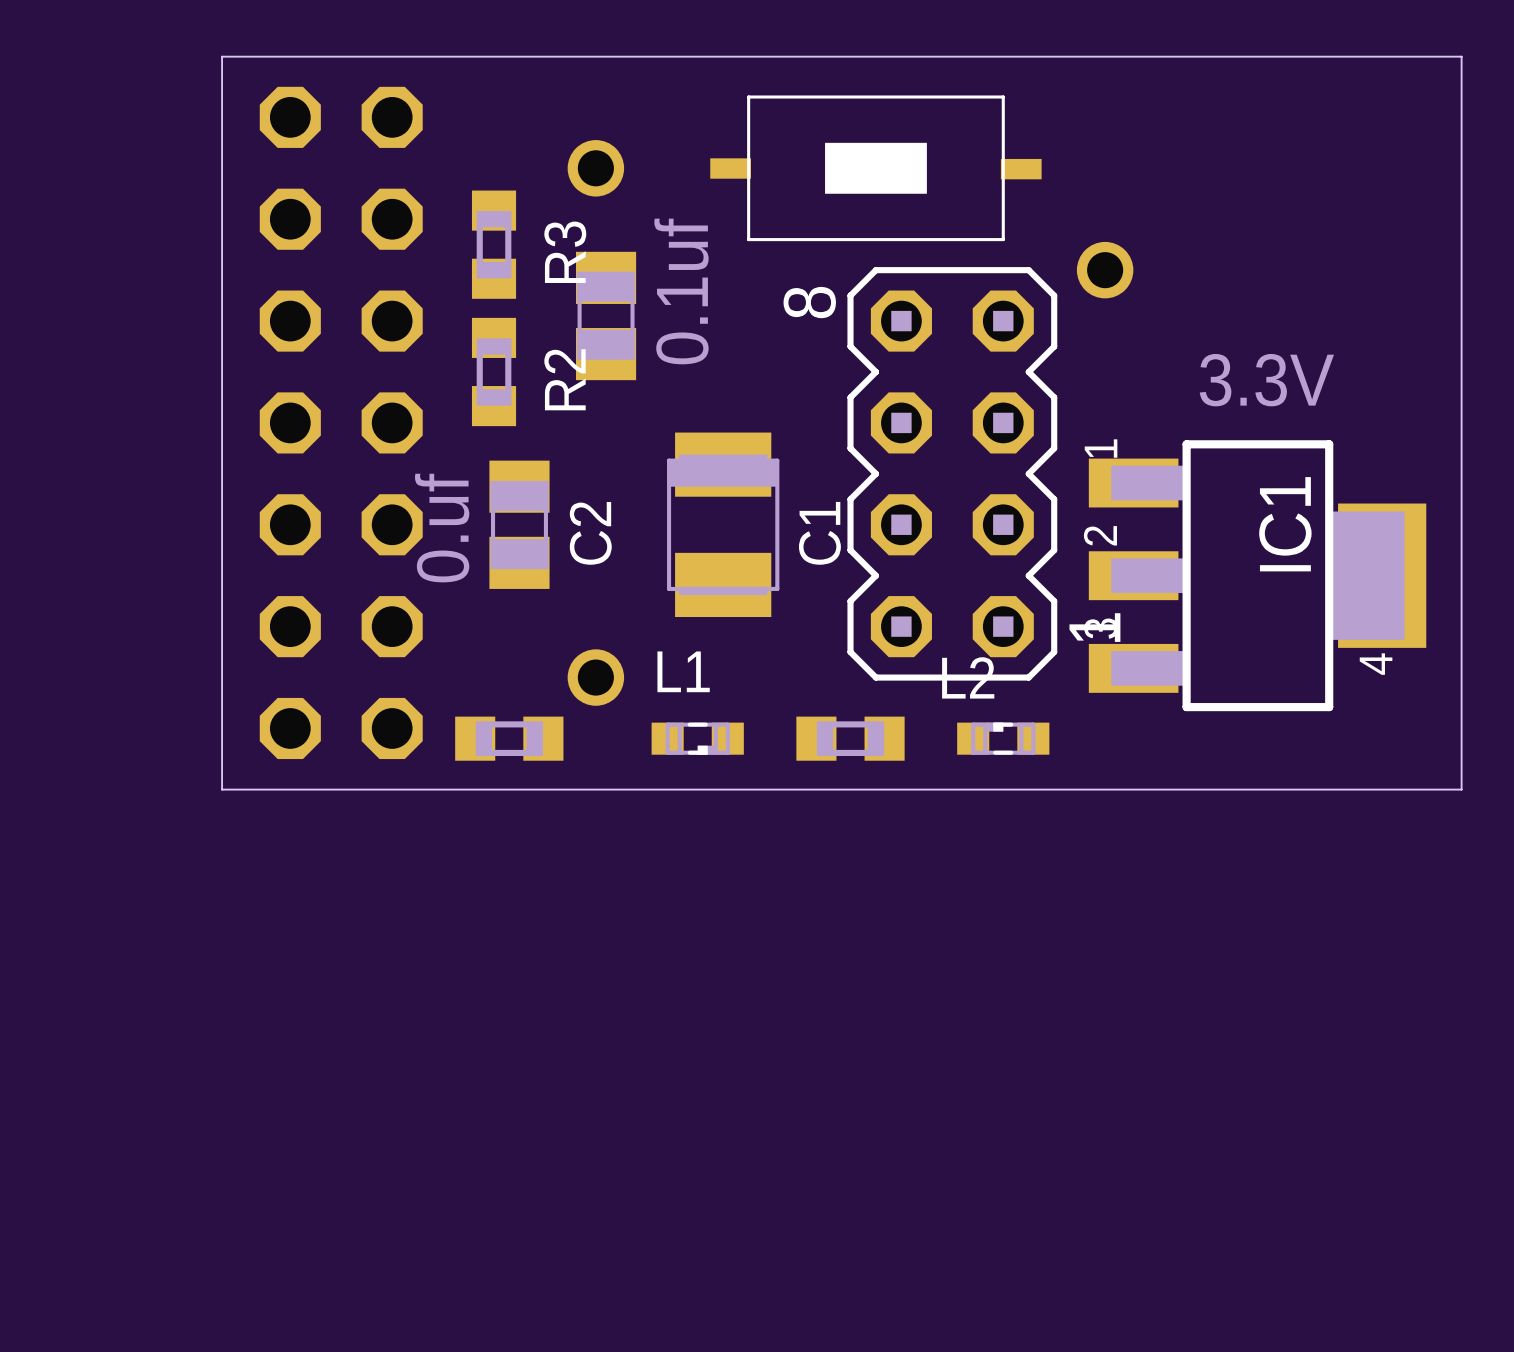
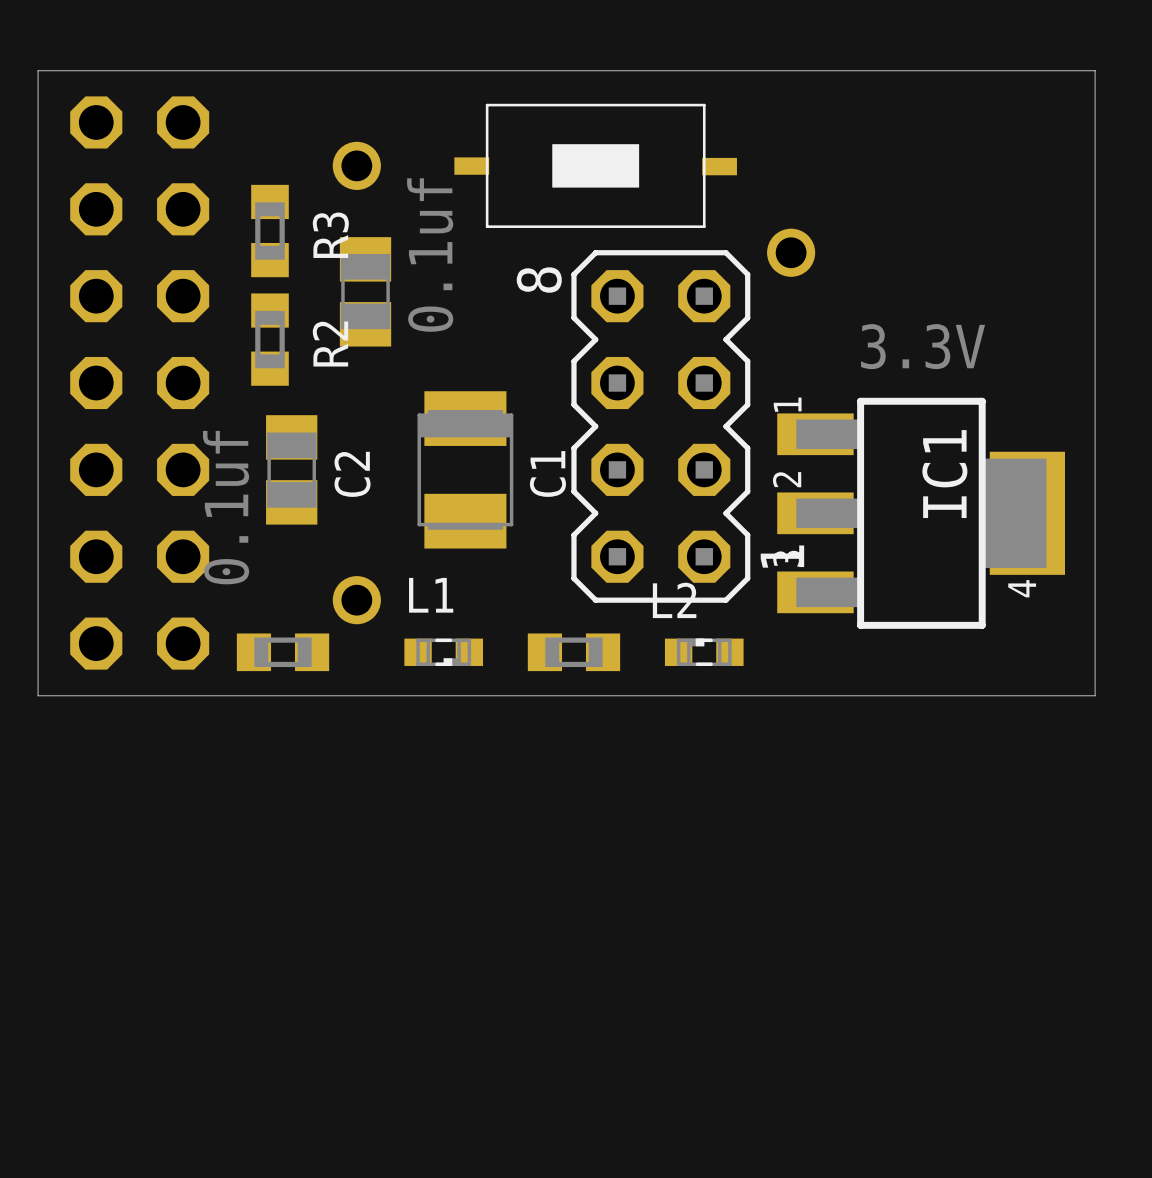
C2 value: 0.uf (442, 528) -> 0.1uf (226, 507)

